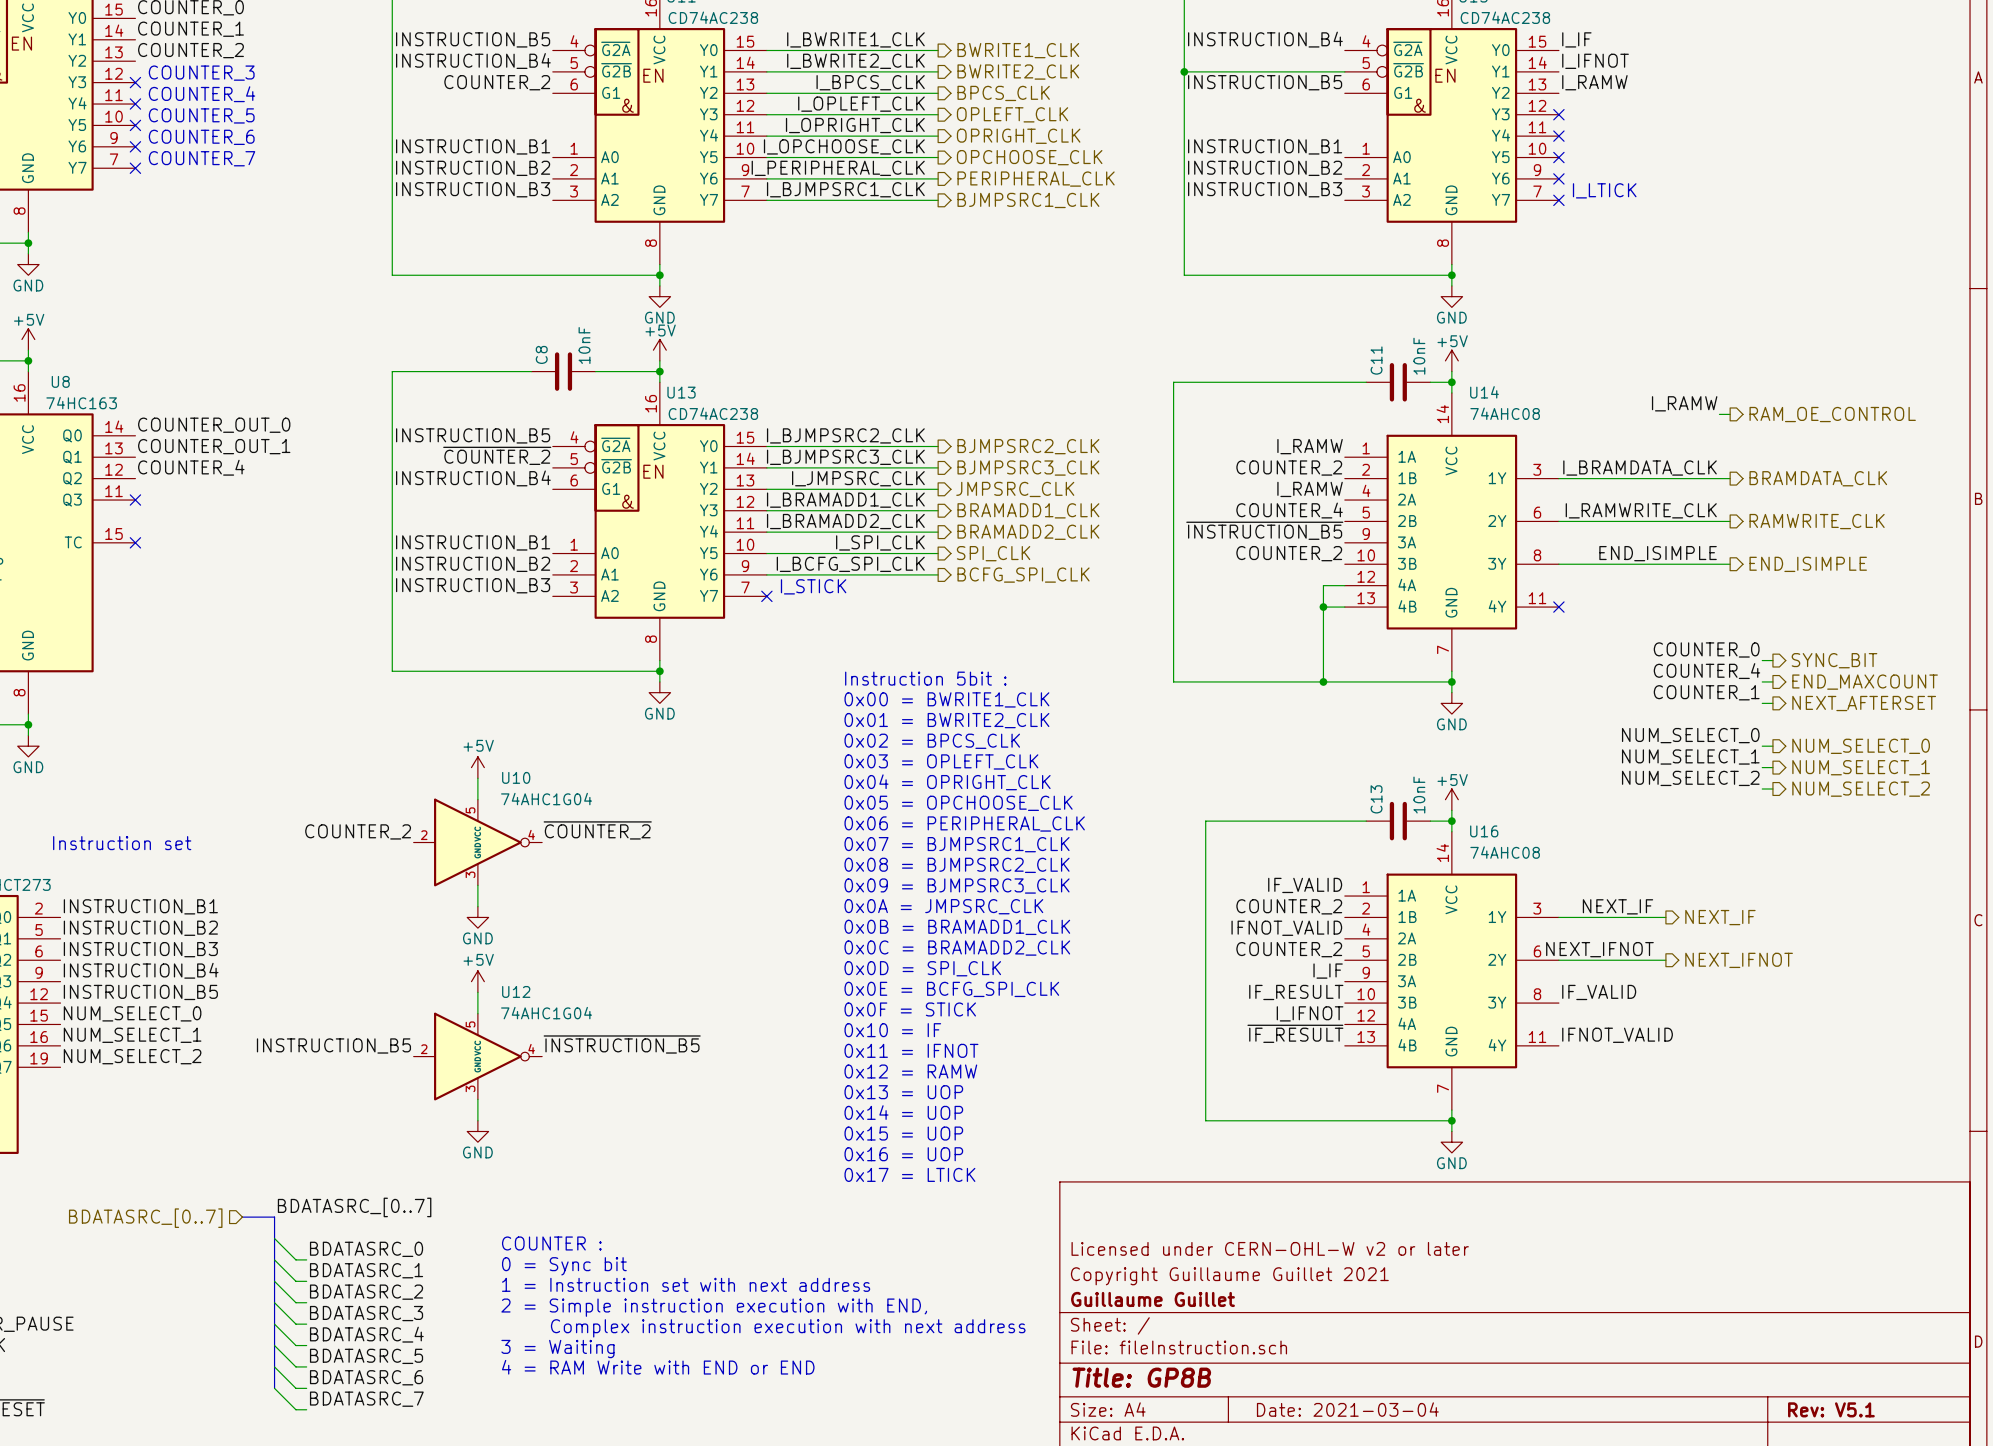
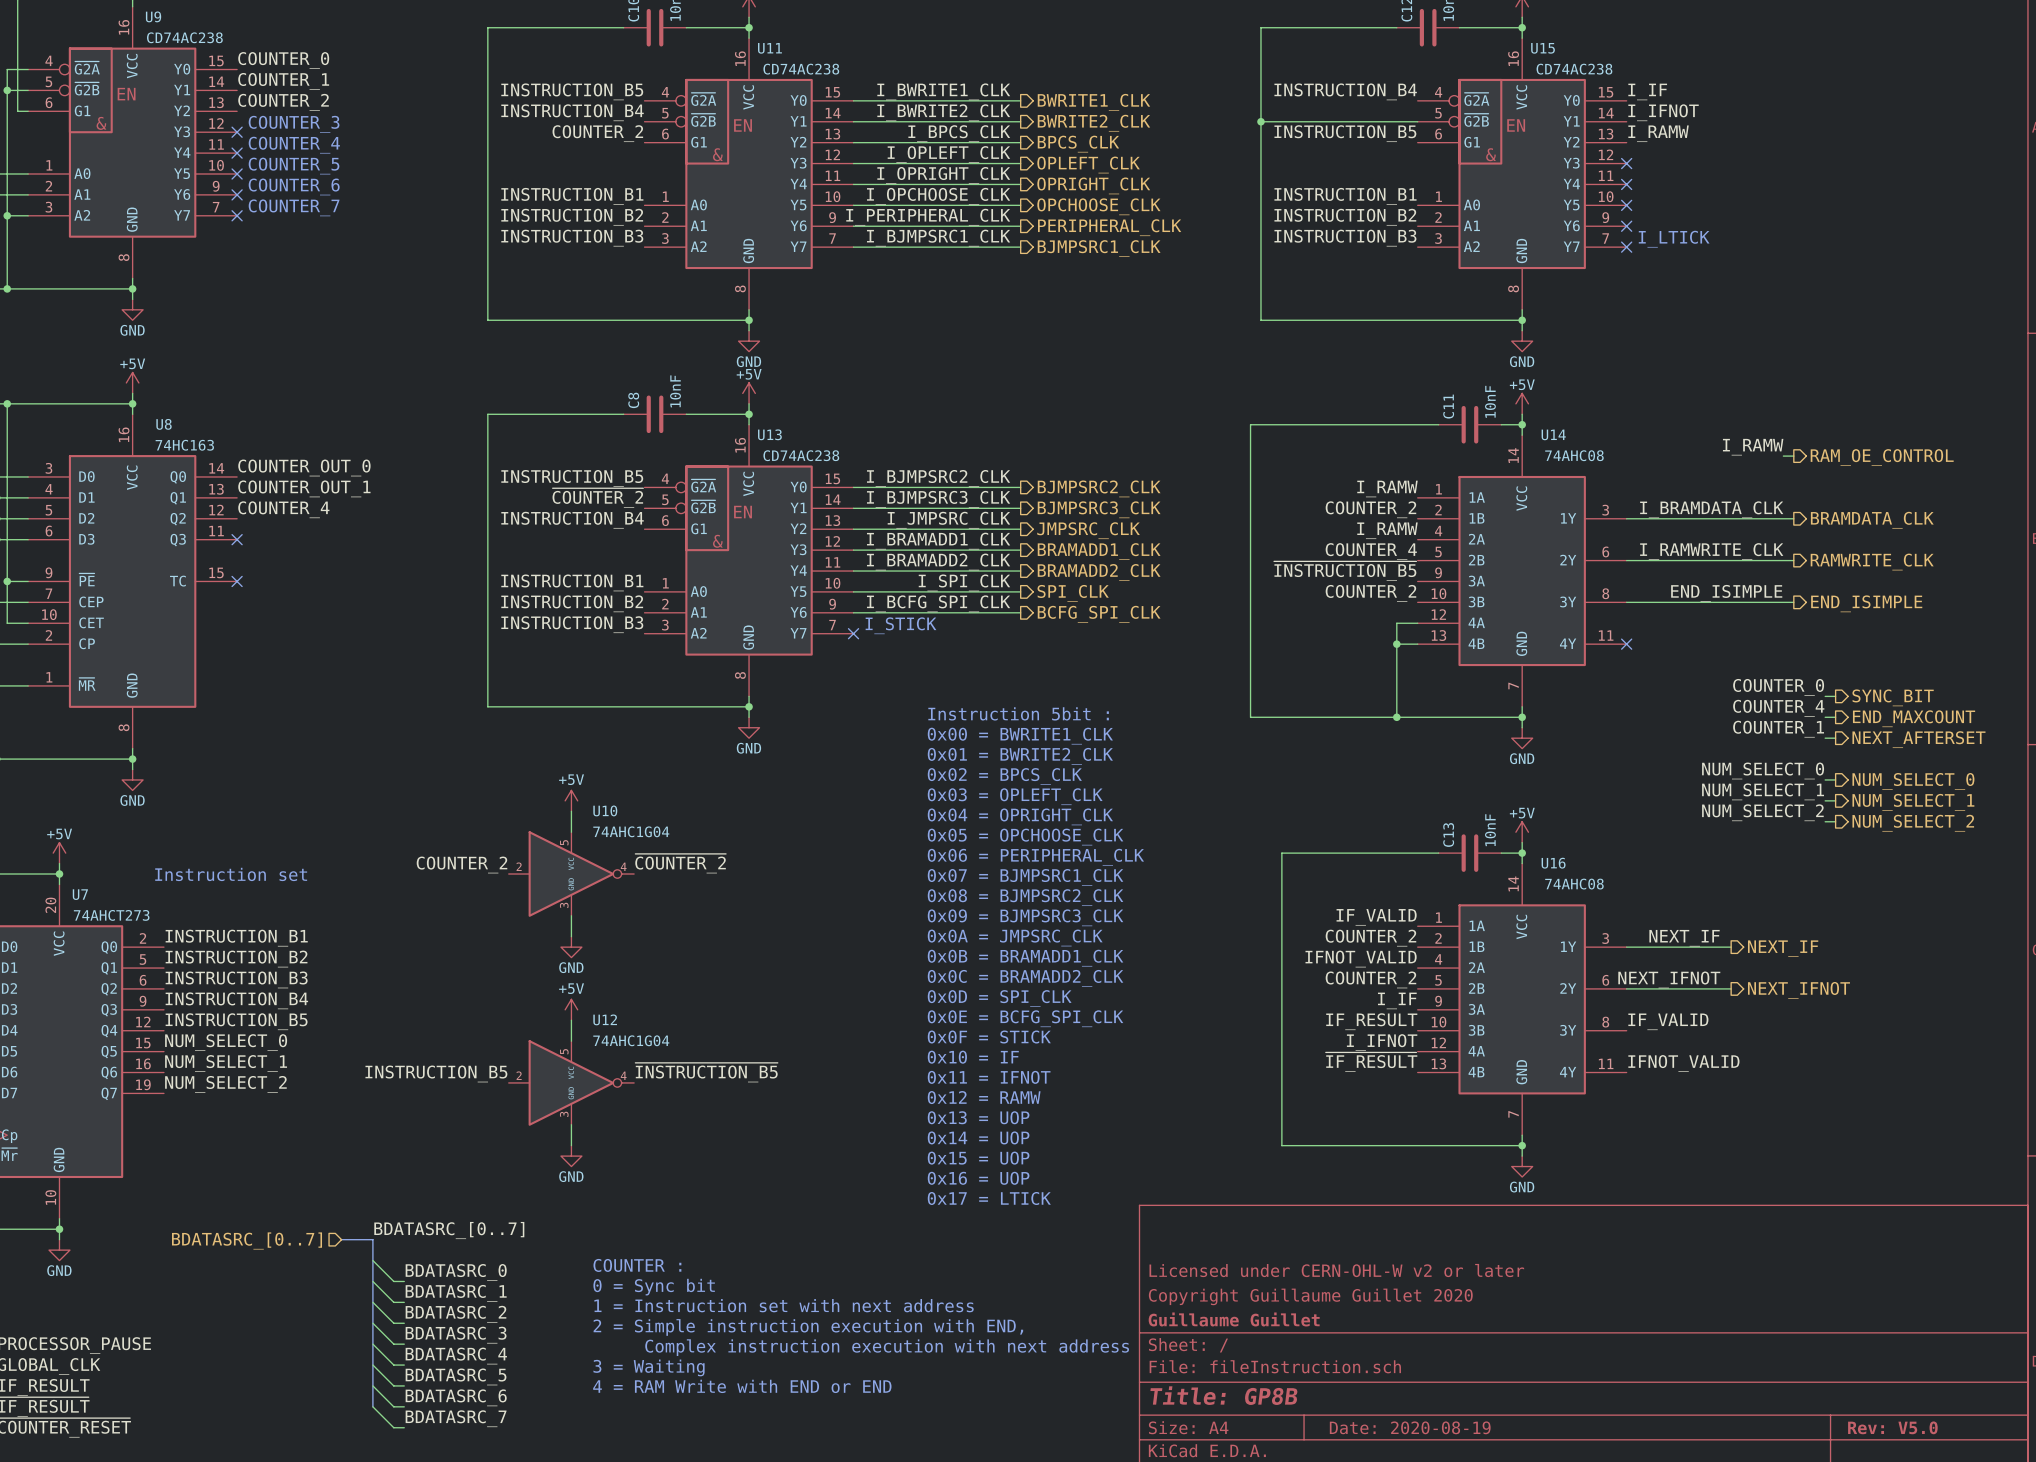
title block: Copyright Guillaume Guillet 2021 (1229, 1276) -> Copyright Guillaume Guillet 2020 (1310, 1296)
title block: Date: 2021-03-04 (1347, 1409) -> Date: 2020-08-19 (1410, 1427)
title block: Rev: V5.1 (1831, 1409) -> Rev: V5.0 (1892, 1427)

